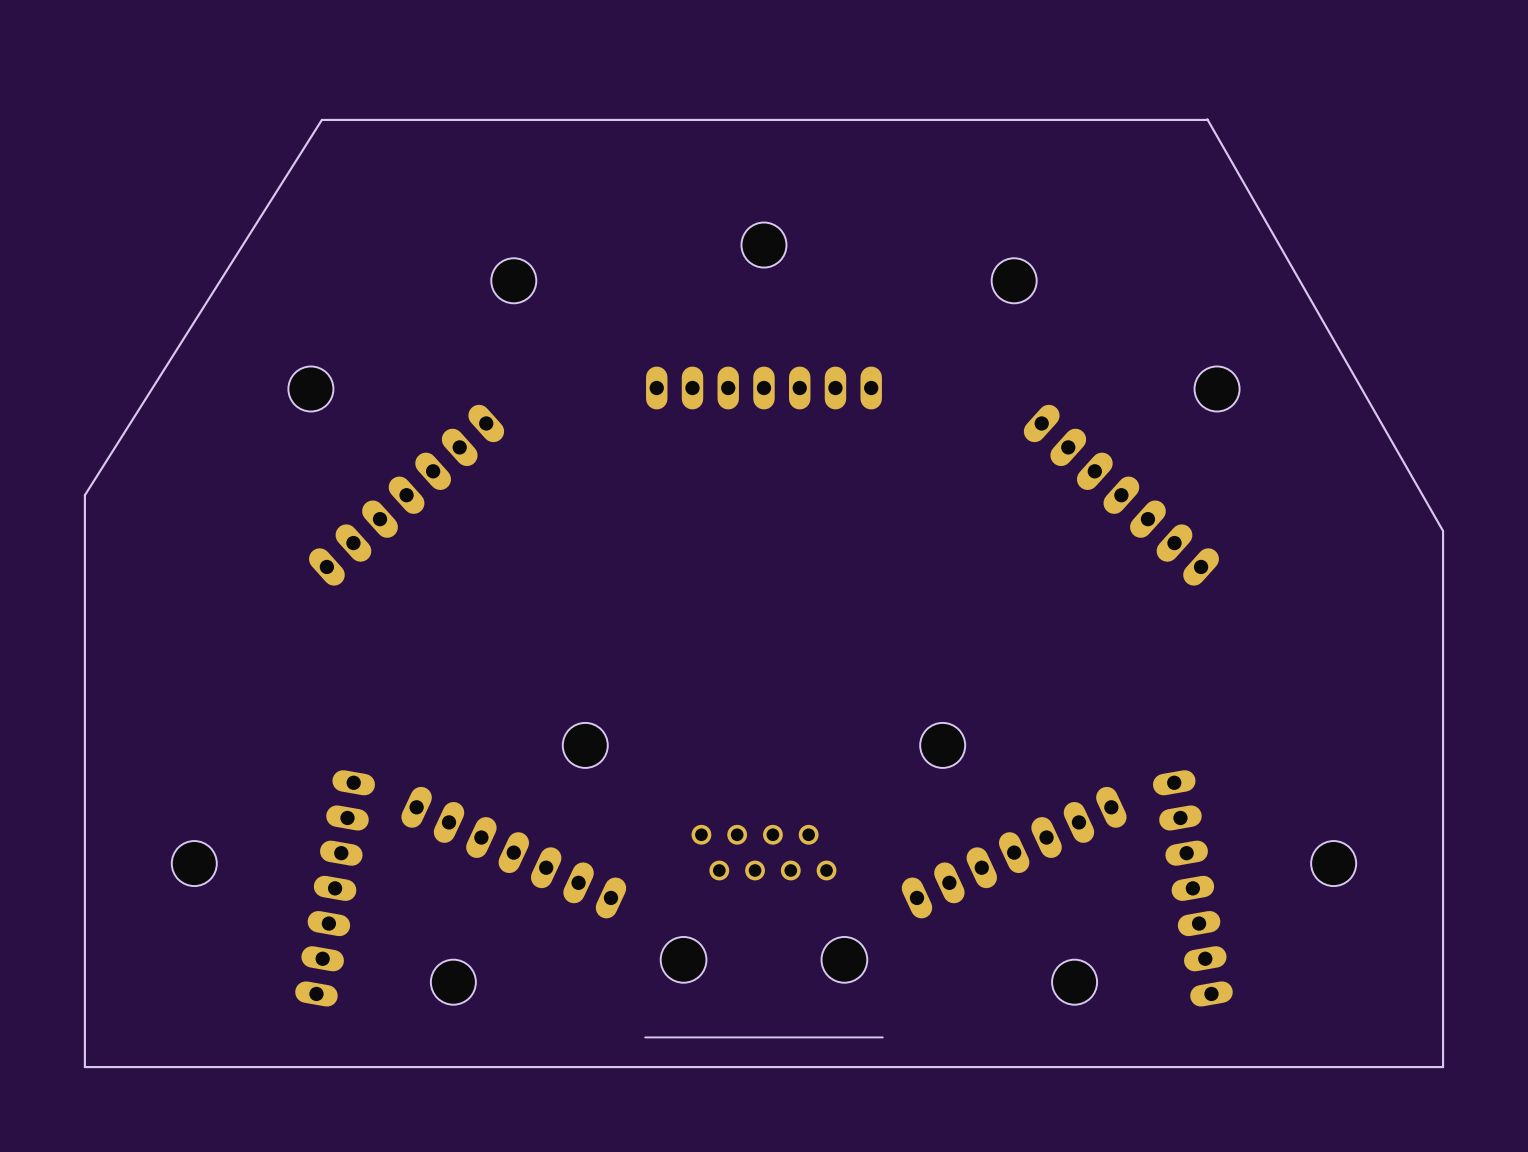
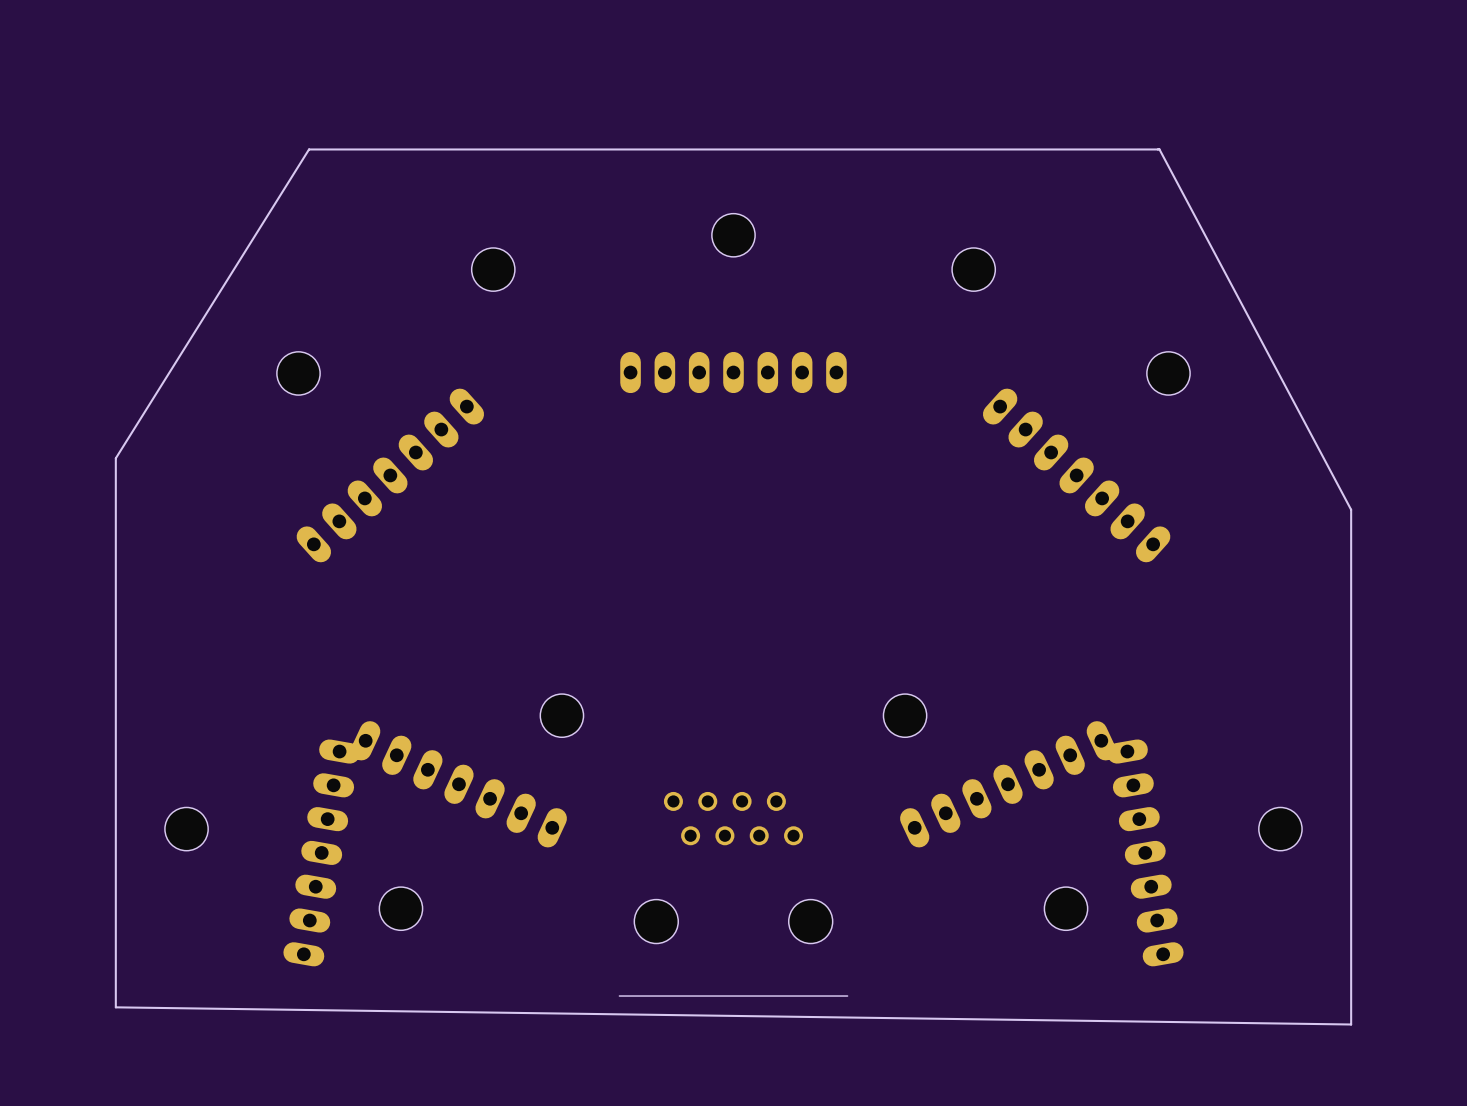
board edge: (1207, 119) (321, 119) (84, 495) (84, 1067) (1443, 1067) (1443, 530) (1207, 119) -> (1159, 149) (1351, 509) (1351, 1024) (115, 1007) (115, 458) (309, 149) (1159, 149)
part position: (513, 852) -> (458, 784)
part position: (1014, 852) -> (1008, 784)
hole position: (453, 982) -> (400, 908)
hole position: (1074, 982) -> (1066, 908)

